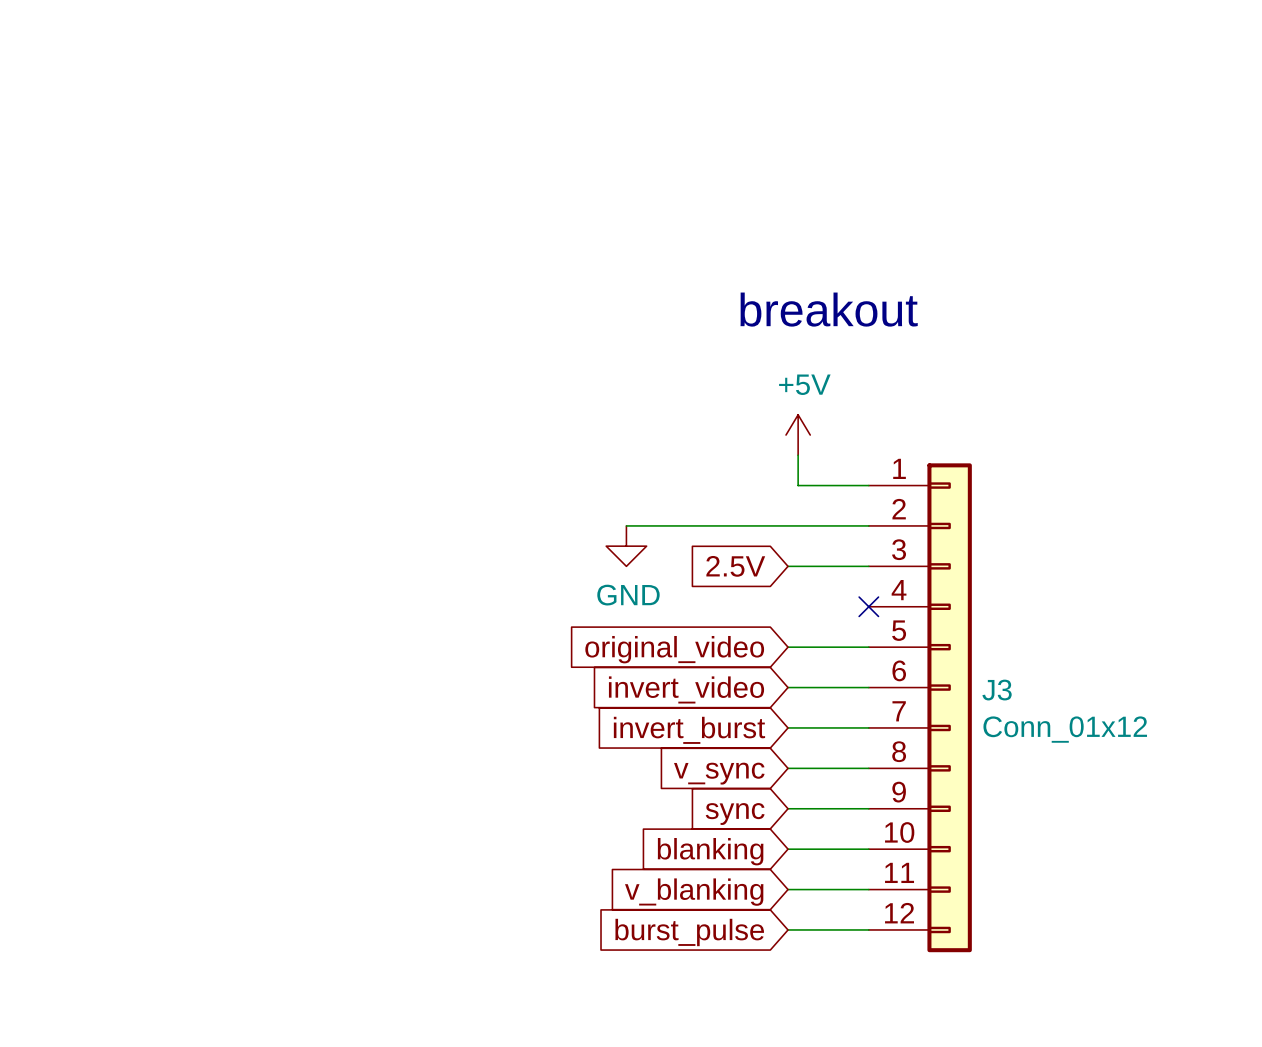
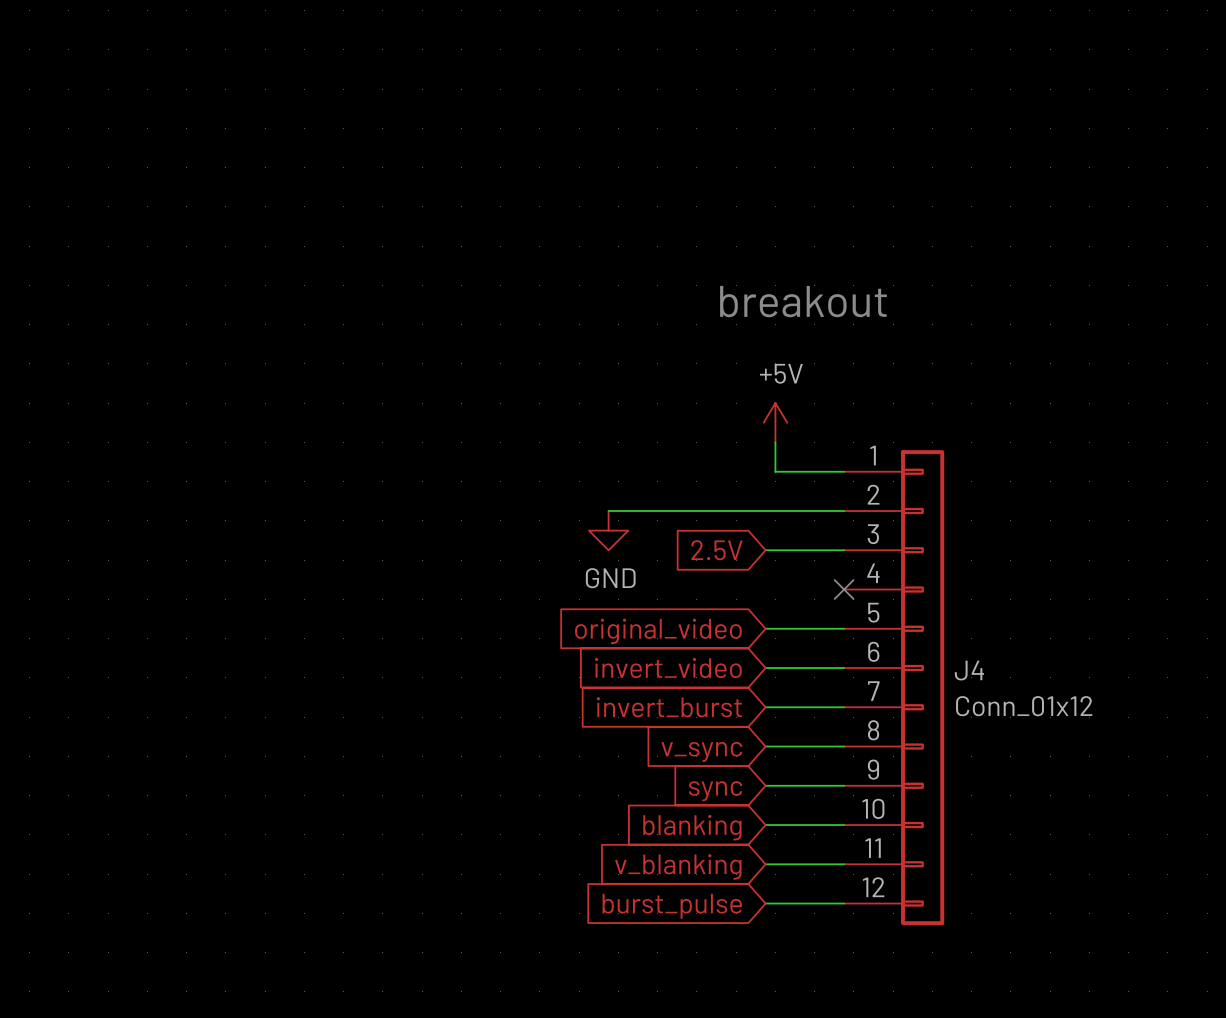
J3 name: J3 (997, 690) -> J4 (969, 670)

